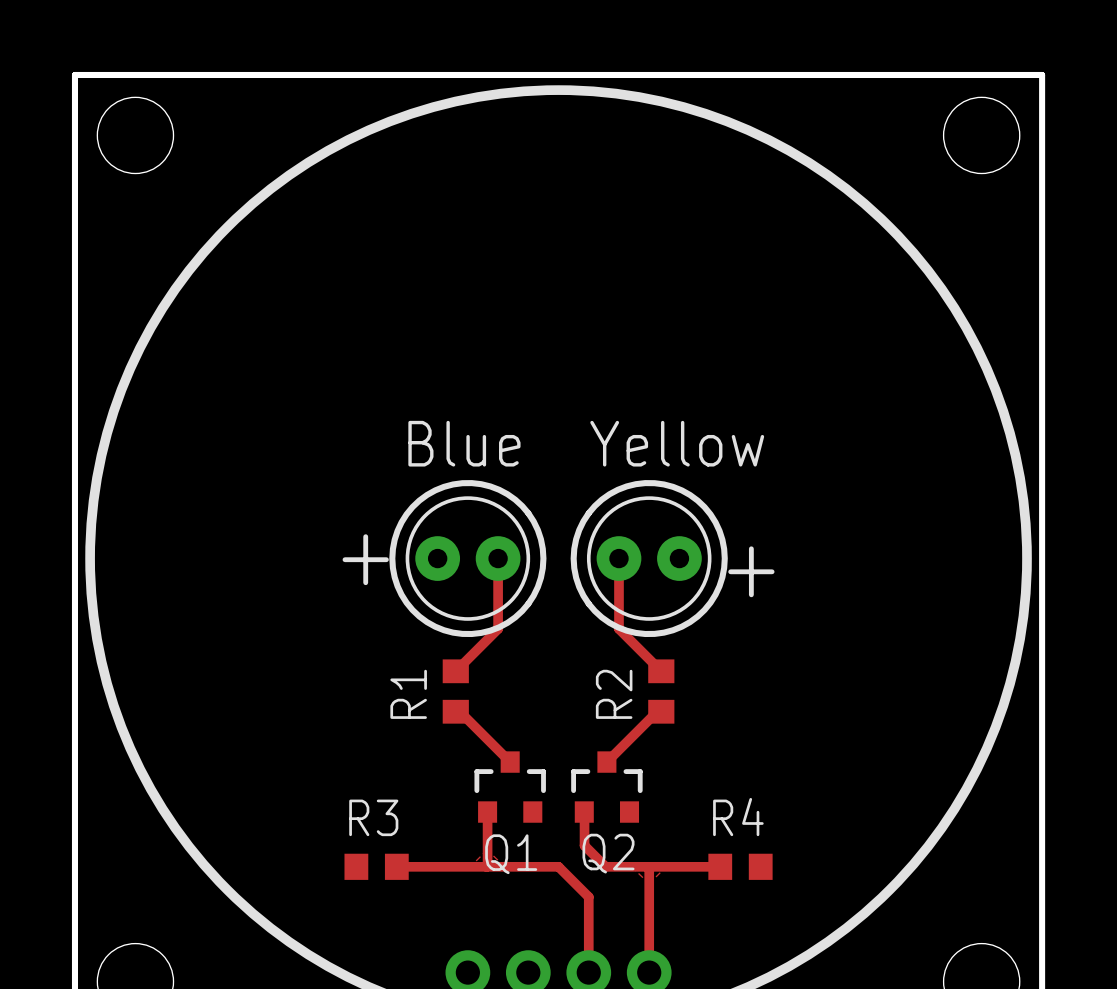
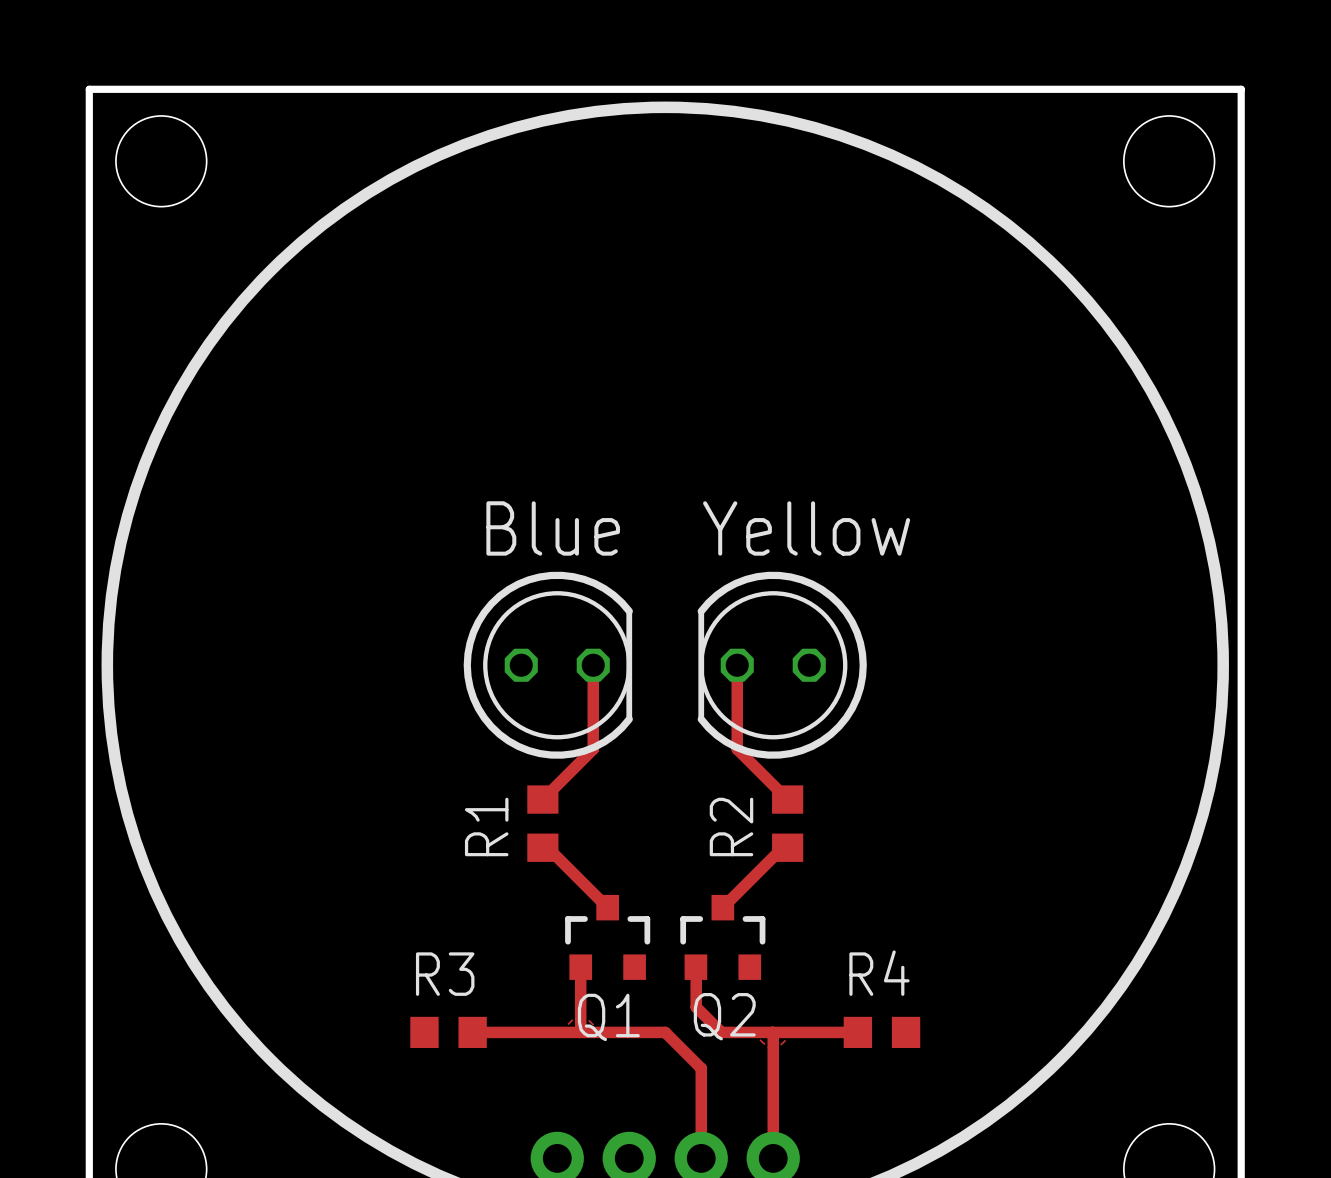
part footprint: [389, 480, 547, 638] -> [463, 571, 633, 759]
part footprint: [570, 480, 728, 638] -> [697, 571, 867, 759]

